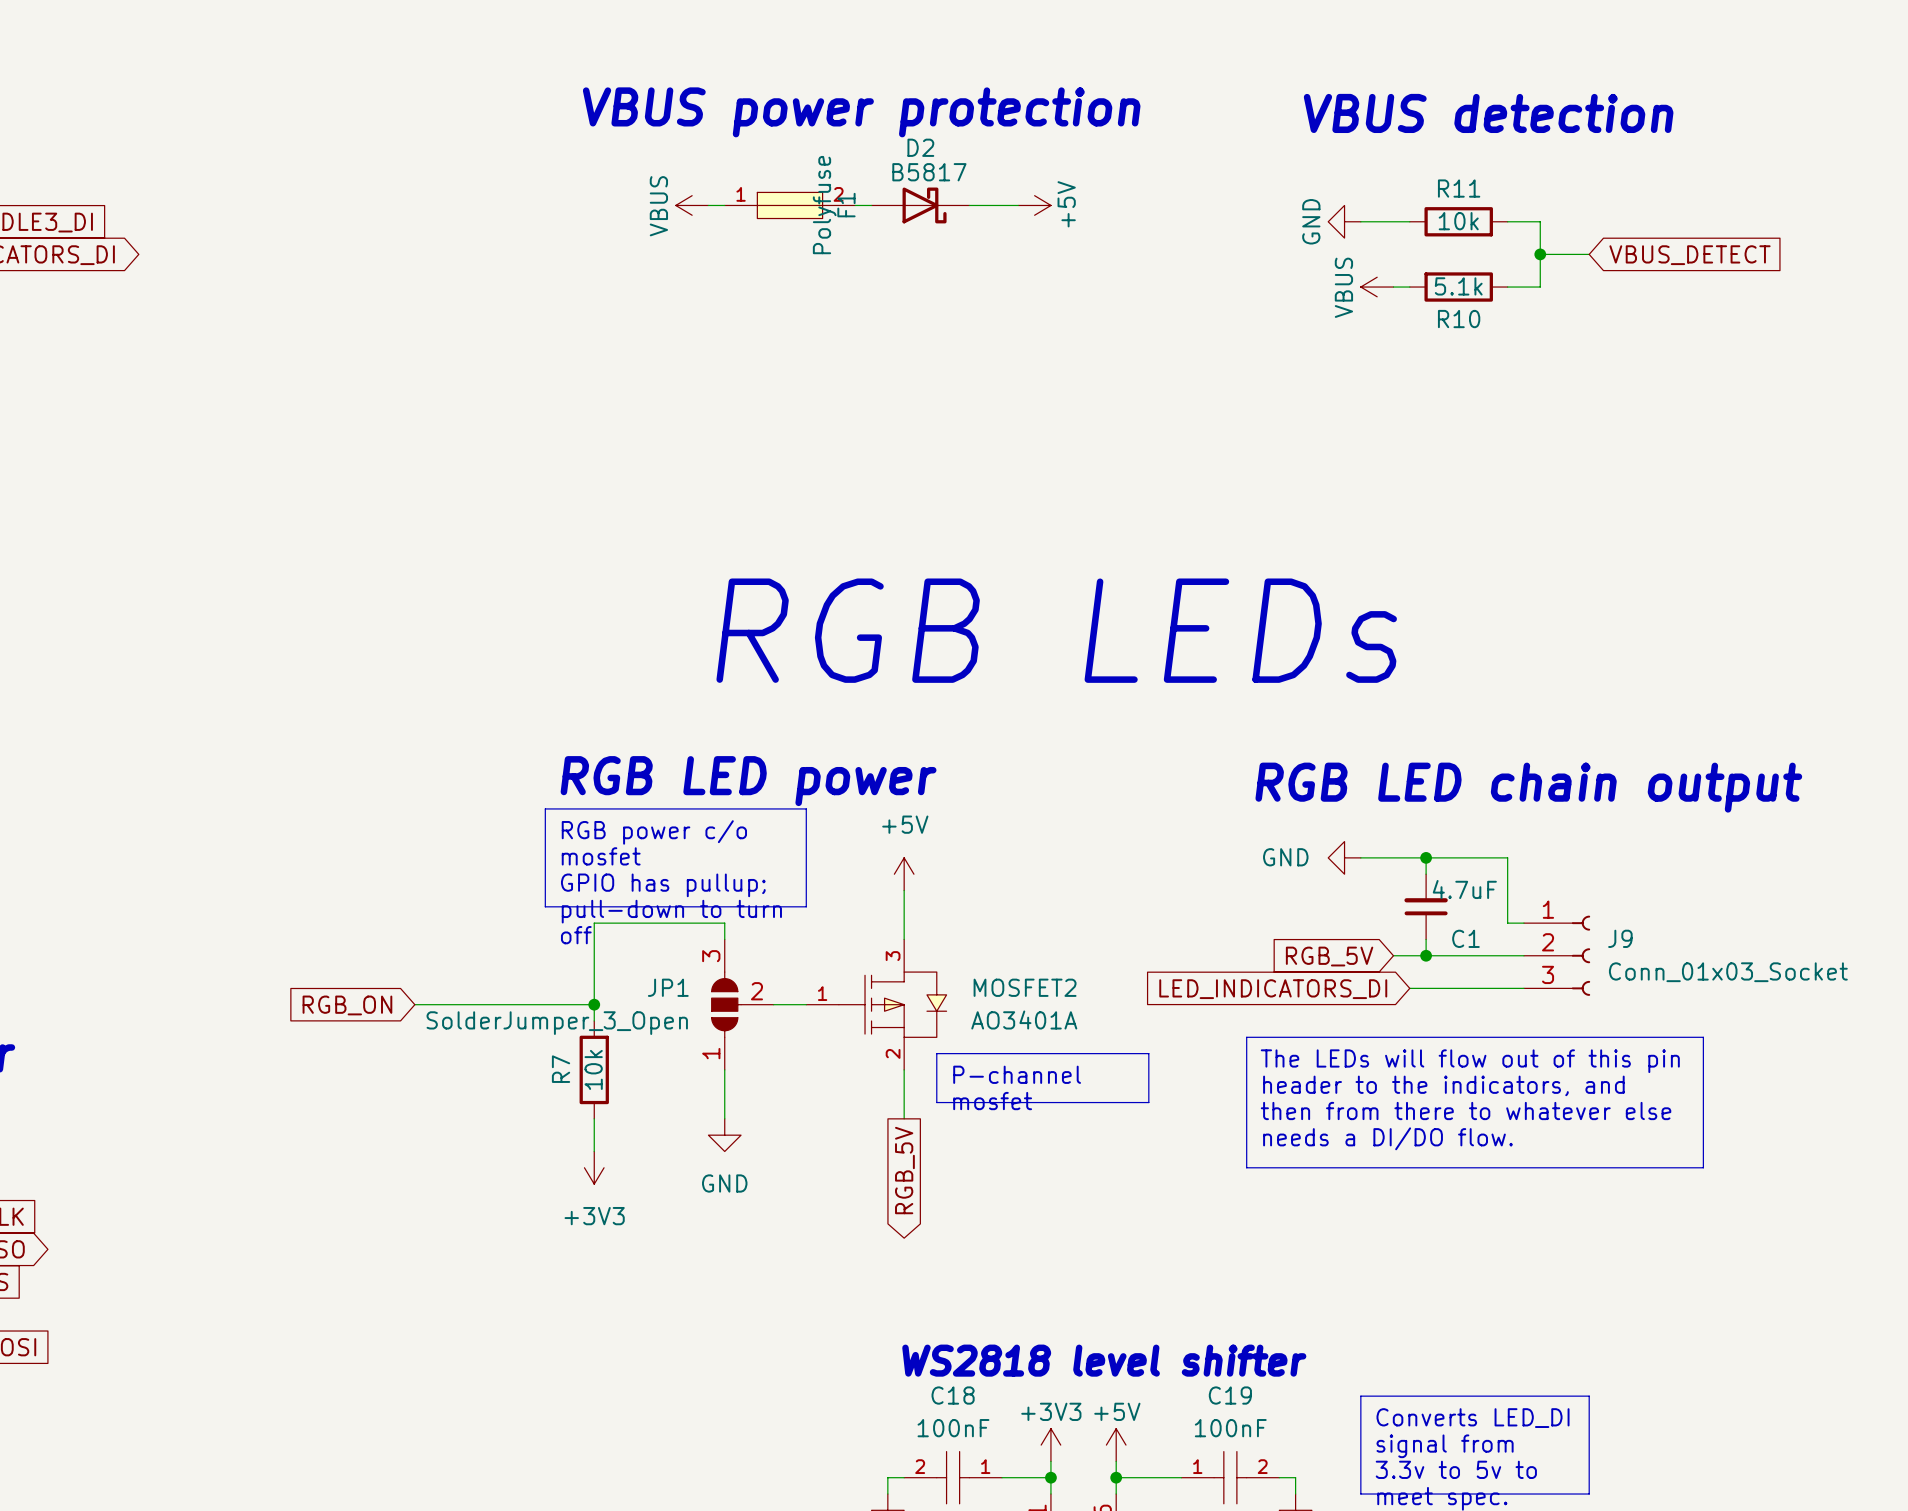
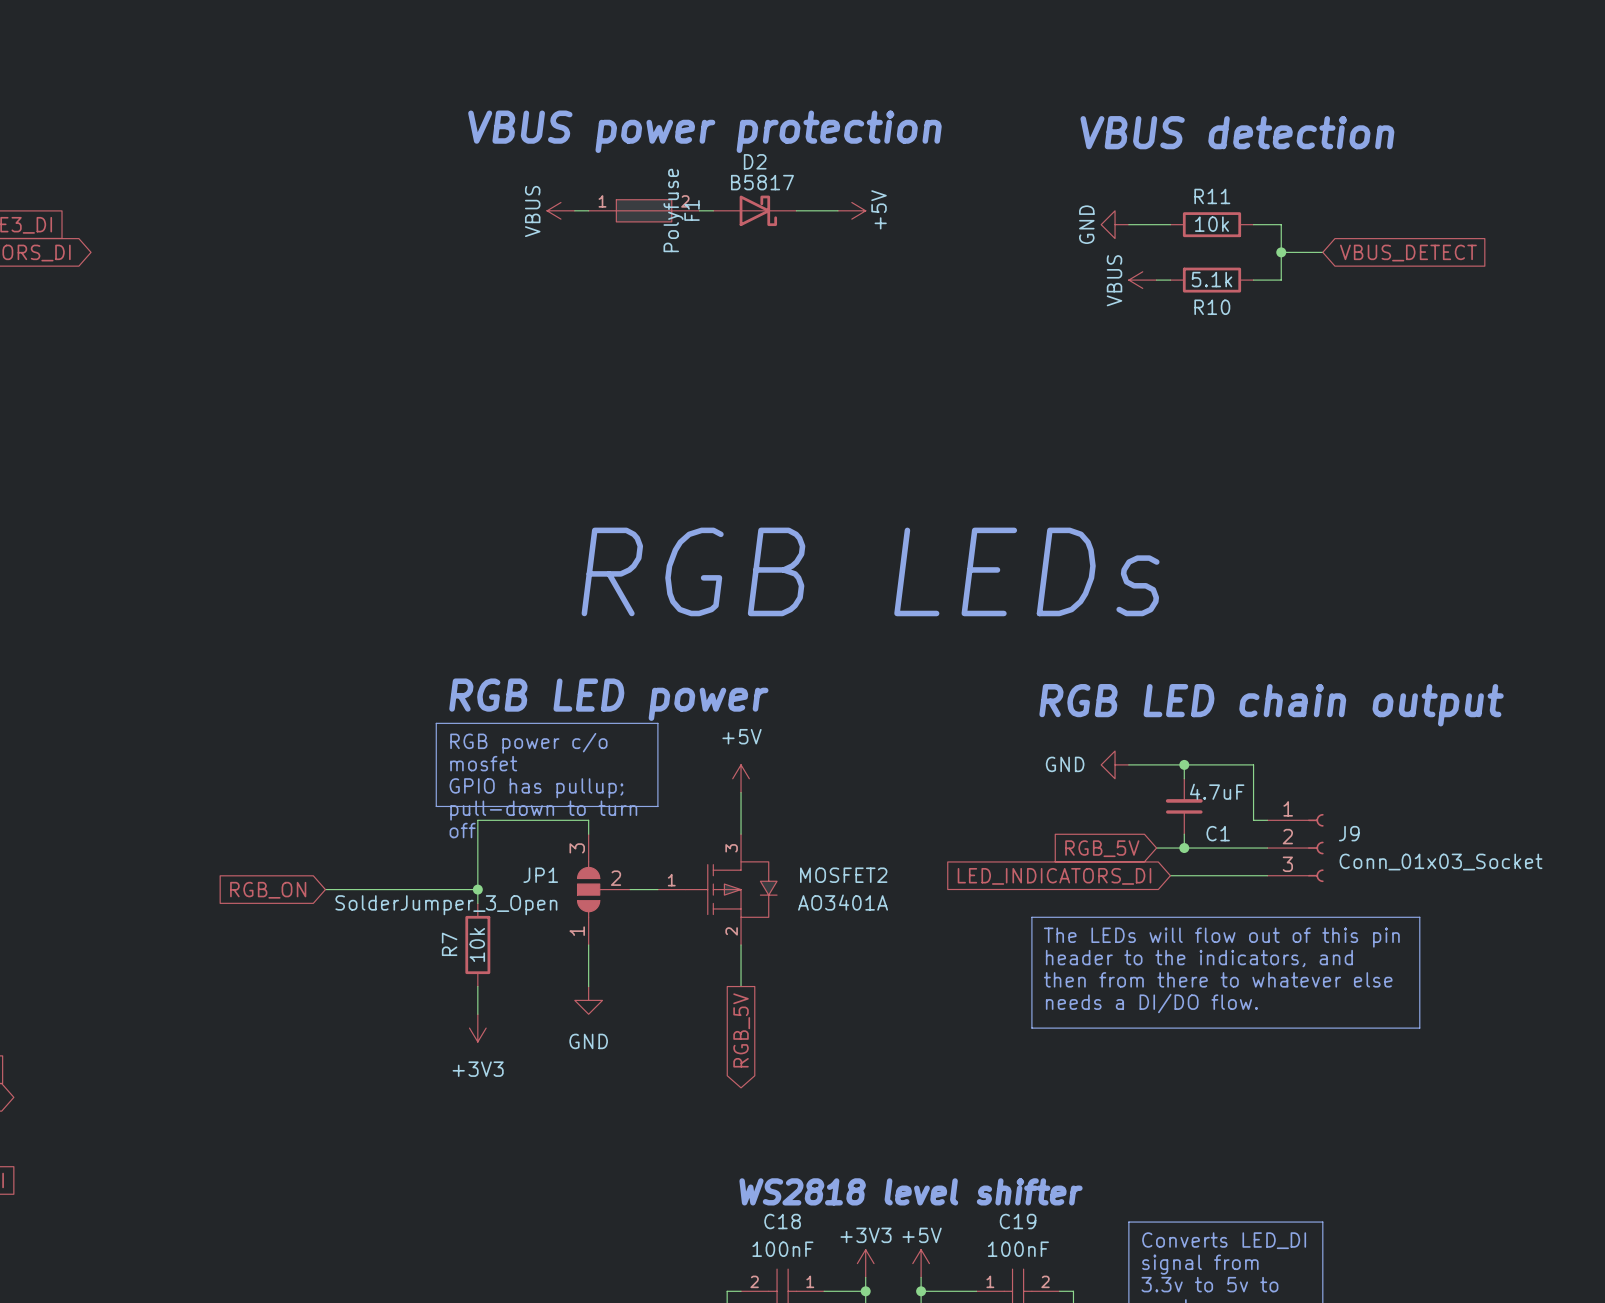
line: (936, 1053) (1148, 1053) (1148, 1102) (936, 1102) (936, 1053) -> none
text: P-channel (1017, 1074) -> none
text: mosfet (992, 1101) -> none

